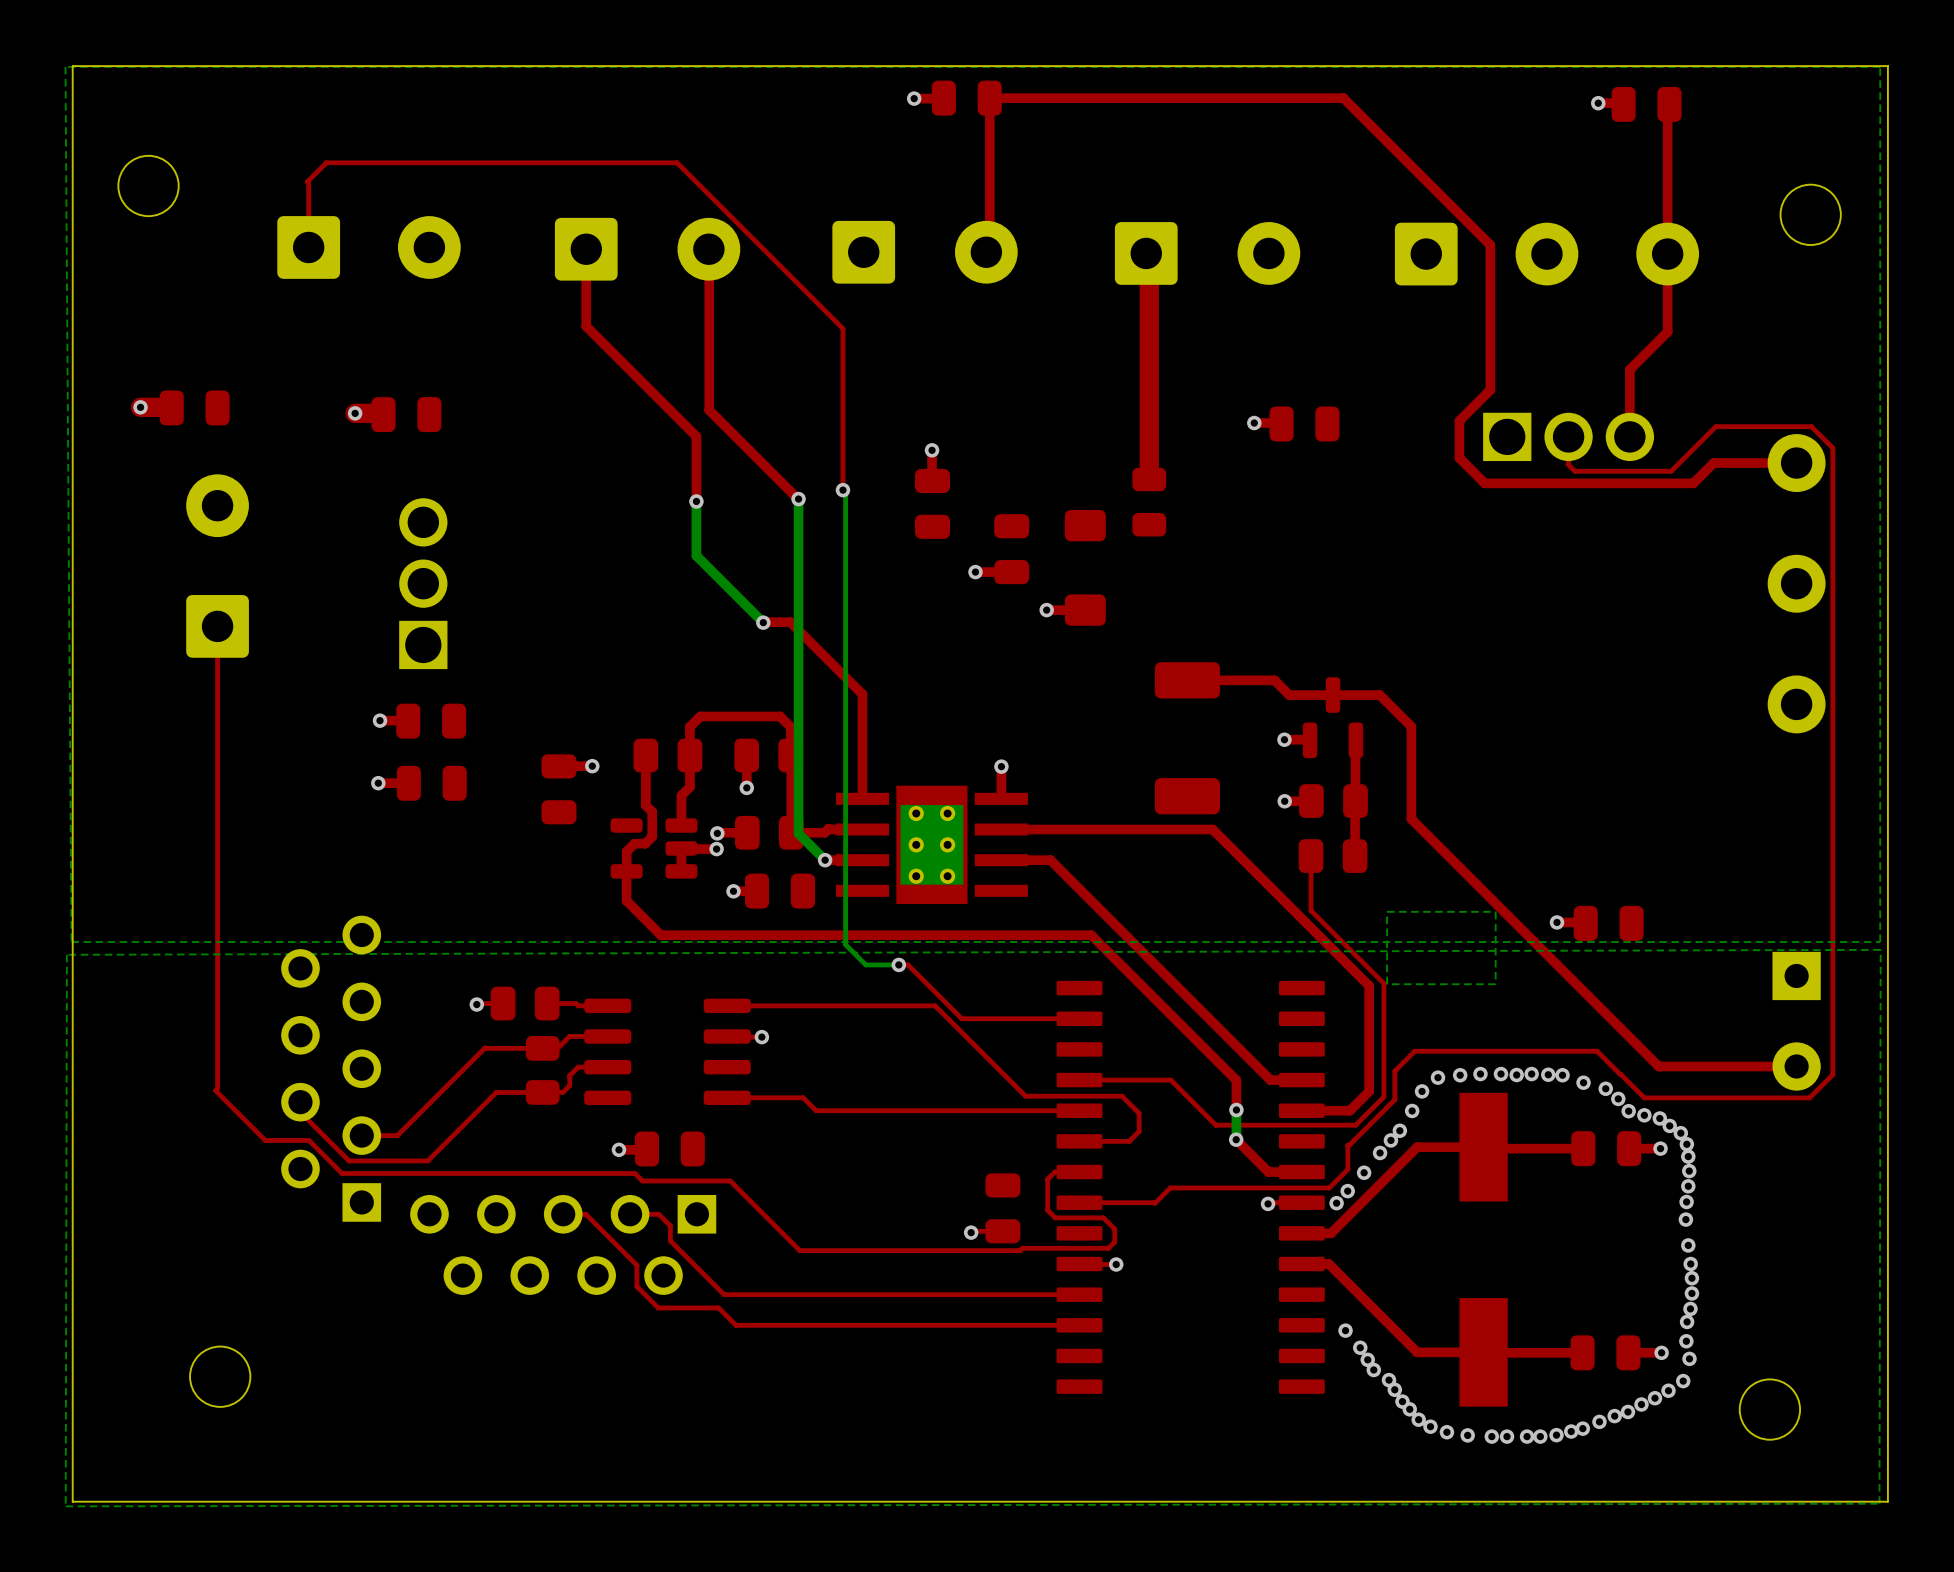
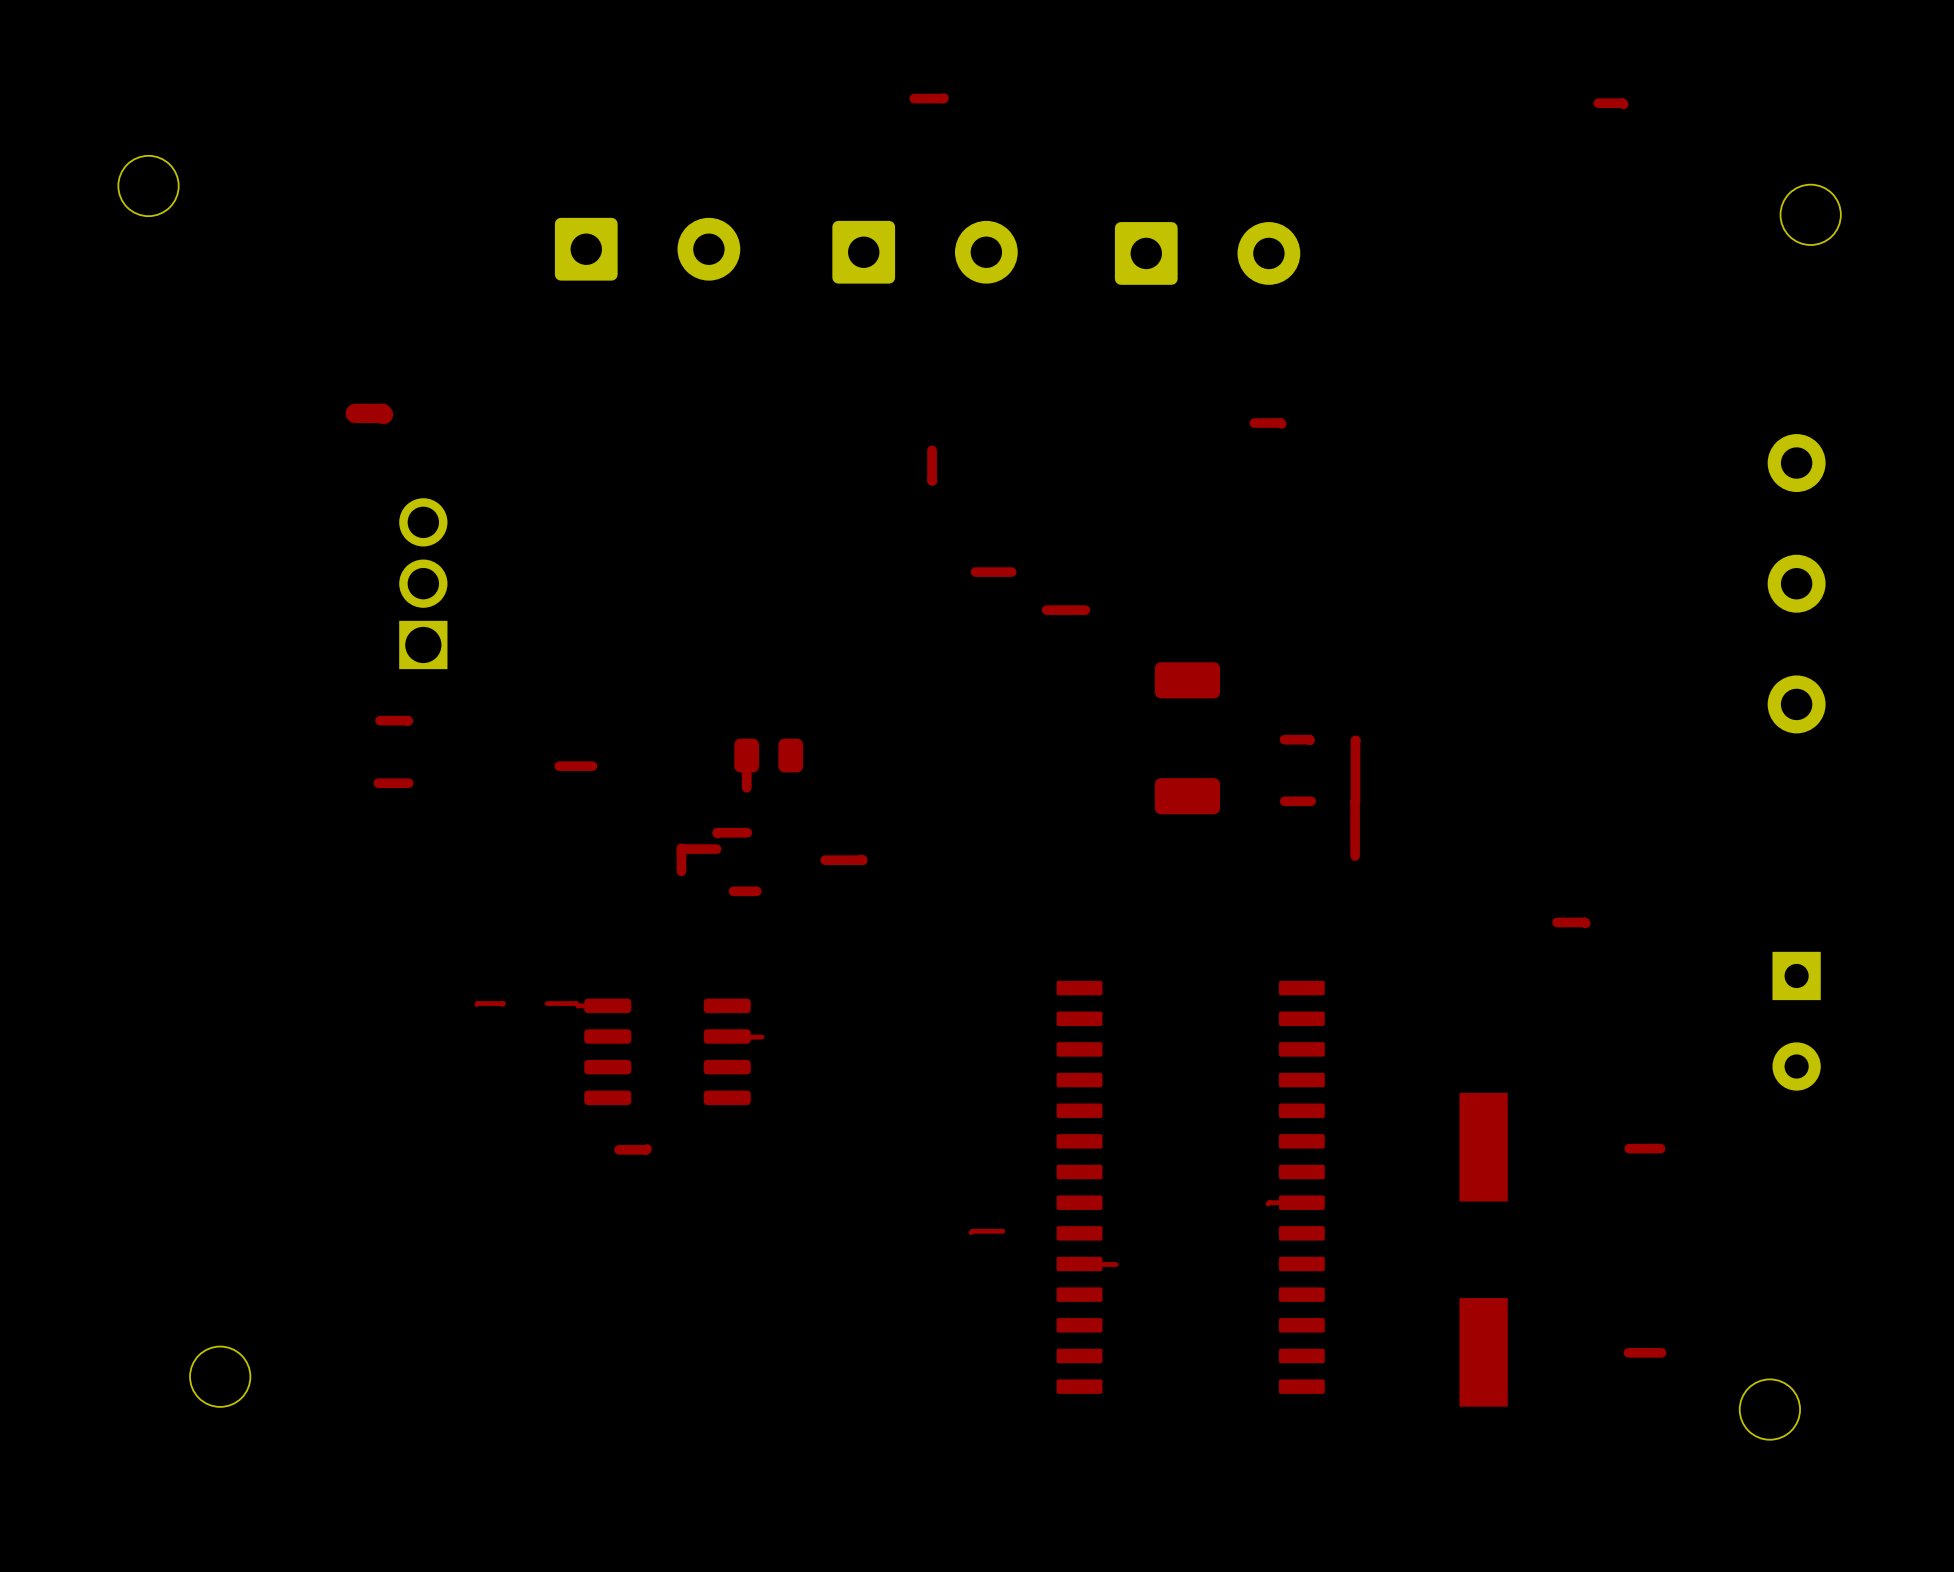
bottom zone outline: (1880, 66) (65, 66) (71, 942) (1880, 942) (1880, 66) -> none
board edge: (1887, 66) (72, 66) (72, 1501) (1887, 1501) (1887, 66) -> none
via: (914, 98) -> none
part: (966, 98) -> none
via: (1598, 103) -> none
part: (1646, 104) -> none
top track: (1669, 104) (1667, 106) (1667, 331) (1629, 369) (1629, 436) -> none
top track: (308, 247) (307, 181) (326, 162) (677, 162) (842, 328) (842, 490) -> none
part: (369, 247) -> none
top track: (586, 249) (586, 326) (696, 436) (696, 501) -> none
top track: (708, 249) (709, 410) (798, 499) -> none
top track: (986, 252) (989, 248) (989, 98) (1343, 98) (1490, 245) (1490, 389) (1459, 420) (1459, 458) (1484, 483) (1693, 483) (1713, 463) (1796, 463) -> none
top track: (1146, 253) (1149, 256) (1149, 479) -> none
part: (1546, 254) -> none
top track: (140, 407) (171, 407) -> none
via: (140, 407) -> none
part: (194, 407) -> none
via: (355, 413) -> none
part: (406, 414) -> none
via: (1254, 423) -> none
part: (1304, 423) -> none
top track: (1568, 436) (1568, 464) (1574, 471) (1671, 471) (1715, 426) (1811, 426) (1832, 448) (1832, 1074) (1809, 1097) (1644, 1097) (1597, 1051) (1414, 1051) (1394, 1071) (1394, 1099) (1347, 1145) (1347, 1169) (1329, 1187) (1170, 1187) (1155, 1203) (1079, 1202) -> none
part: (1568, 436) -> none
via: (932, 450) -> none
bottom track: (842, 490) (845, 492) (845, 944) (865, 964) (898, 964) -> none
via: (842, 490) -> none
bottom track: (798, 499) (798, 833) (825, 860) -> none
via: (798, 499) -> none
bottom track: (696, 501) (696, 555) (763, 622) -> none
via: (696, 501) -> none
part: (1149, 502) -> none
part: (932, 503) -> none
part: (1011, 549) -> none
part: (217, 566) -> none
part: (1085, 567) -> none
via: (975, 572) -> none
via: (1046, 610) -> none
top track: (763, 622) (790, 622) (862, 694) (862, 798) -> none
via: (763, 622) -> none
top track: (217, 626) (217, 1088) (215, 1090) (265, 1140) (308, 1140) (342, 1173) (634, 1173) (642, 1180) (730, 1180) (799, 1250) (1020, 1250) (1022, 1248) (1108, 1248) (1114, 1242) (1114, 1229) (1103, 1217) (1055, 1217) (1047, 1210) (1047, 1179) (1054, 1172) (1079, 1172) -> none
top track: (1187, 680) (1274, 680) (1289, 695) (1379, 695) (1411, 726) (1411, 819) (1658, 1066) (1796, 1066) -> none
part: (1332, 717) -> none
via: (380, 720) -> none
part: (431, 721) -> none
via: (1284, 739) -> none
top track: (645, 755) (645, 805) (652, 811) (652, 836) (645, 843) (634, 843) (626, 851) (626, 900) (660, 935) (1091, 935) (1236, 1080) (1236, 1111) -> none
part: (667, 755) -> none
via: (592, 766) -> none
top track: (1001, 766) (1001, 798) -> none
via: (1001, 766) -> none
via: (378, 783) -> none
part: (431, 783) -> none
via: (746, 787) -> none
part: (558, 789) -> none
via: (1284, 801) -> none
part: (1333, 801) -> none
top track: (681, 825) (681, 795) (689, 787) (689, 726) (700, 716) (780, 716) (790, 727) (791, 832) (824, 832) (828, 828) (862, 829) -> none
top track: (1001, 829) (1212, 829) (1369, 985) (1369, 1091) (1349, 1110) (1301, 1110) -> none
part: (769, 832) -> none
via: (717, 833) -> none
part: (931, 844) -> none
part: (654, 848) -> none
via: (716, 849) -> none
top track: (1311, 856) (1311, 910) (1383, 983) (1383, 1096) (1355, 1125) (1215, 1125) (1170, 1080) (1079, 1080) -> none
part: (1333, 856) -> none
via: (825, 860) -> none
top track: (1001, 860) (1050, 860) (1270, 1080) (1301, 1080) -> none
via: (733, 891) -> none
part: (779, 891) -> none
bottom zone outline: (1495, 911) (1495, 984) (1387, 984) (1387, 911) (1495, 911) -> none
via: (1556, 922) -> none
part: (1608, 923) -> none
bottom zone outline: (1880, 949) (66, 954) (65, 1506) (1879, 1503) (1880, 949) -> none
top track: (898, 964) (907, 964) (961, 1018) (1079, 1018) -> none
via: (898, 964) -> none
part: (525, 1003) -> none
via: (476, 1004) -> none
top track: (727, 1005) (935, 1005) (1025, 1096) (1121, 1096) (1139, 1113) (1139, 1131) (1129, 1141) (1079, 1141) -> none
top track: (607, 1036) (569, 1036) (557, 1048) (485, 1047) (397, 1135) (361, 1135) -> none
via: (761, 1037) -> none
top track: (607, 1067) (578, 1067) (569, 1075) (569, 1085) (562, 1092) (496, 1092) (427, 1160) (349, 1160) (300, 1112) (300, 1102) -> none
part: (331, 1068) -> none
part: (542, 1070) -> none
via: (1480, 1074) -> none
via: (1500, 1074) -> none
via: (1531, 1074) -> none
via: (1548, 1074) -> none
via: (1460, 1075) -> none
via: (1516, 1075) -> none
via: (1562, 1075) -> none
via: (1437, 1077) -> none
via: (1583, 1082) -> none
via: (1605, 1088) -> none
via: (1422, 1091) -> none
top track: (727, 1097) (803, 1097) (816, 1110) (1079, 1110) -> none
via: (1618, 1098) -> none
bottom track: (1236, 1110) (1236, 1136) -> none
via: (1236, 1110) -> none
via: (1412, 1110) -> none
via: (1628, 1111) -> none
via: (1644, 1115) -> none
via: (1659, 1118) -> none
via: (1669, 1125) -> none
via: (1399, 1130) -> none
via: (1680, 1133) -> none
top track: (1236, 1139) (1268, 1172) (1301, 1172) -> none
via: (1236, 1139) -> none
via: (1390, 1140) -> none
via: (1686, 1144) -> none
part: (669, 1148) -> none
top track: (1583, 1148) (1417, 1147) (1331, 1233) (1301, 1233) (1304, 1236) -> none
part: (1606, 1148) -> none
via: (1660, 1148) -> none
via: (618, 1149) -> none
via: (1380, 1152) -> none
via: (1688, 1156) -> none
via: (1689, 1171) -> none
via: (1364, 1172) -> none
via: (1688, 1186) -> none
via: (1347, 1191) -> none
via: (1686, 1201) -> none
via: (1268, 1203) -> none
via: (1336, 1203) -> none
part: (1002, 1208) -> none
top track: (563, 1214) (585, 1214) (636, 1265) (636, 1286) (658, 1307) (718, 1307) (736, 1325) (1079, 1325) -> none
top track: (630, 1214) (658, 1214) (670, 1225) (670, 1240) (724, 1294) (1079, 1294) -> none
via: (1685, 1219) -> none
via: (971, 1232) -> none
part: (563, 1244) -> none
via: (1688, 1245) -> none
via: (1116, 1264) -> none
top track: (1301, 1264) (1328, 1264) (1417, 1352) (1582, 1352) -> none
via: (1690, 1264) -> none
via: (1691, 1278) -> none
via: (1691, 1293) -> none
via: (1690, 1308) -> none
via: (1687, 1321) -> none
via: (1345, 1330) -> none
via: (1686, 1341) -> none
via: (1360, 1347) -> none
part: (1605, 1352) -> none
via: (1661, 1352) -> none
via: (1689, 1358) -> none
via: (1367, 1359) -> none
via: (1373, 1369) -> none
via: (1388, 1380) -> none
via: (1683, 1381) -> none
via: (1394, 1389) -> none
via: (1668, 1390) -> none
via: (1654, 1398) -> none
via: (1402, 1401) -> none
via: (1641, 1404) -> none
via: (1409, 1409) -> none
via: (1627, 1411) -> none
via: (1614, 1416) -> none
via: (1418, 1419) -> none
via: (1599, 1421) -> none
via: (1430, 1426) -> none
via: (1582, 1428) -> none
via: (1571, 1431) -> none
via: (1446, 1432) -> none
via: (1467, 1435) -> none
via: (1556, 1435) -> none
via: (1491, 1436) -> none
via: (1507, 1436) -> none
via: (1527, 1436) -> none
via: (1540, 1436) -> none

